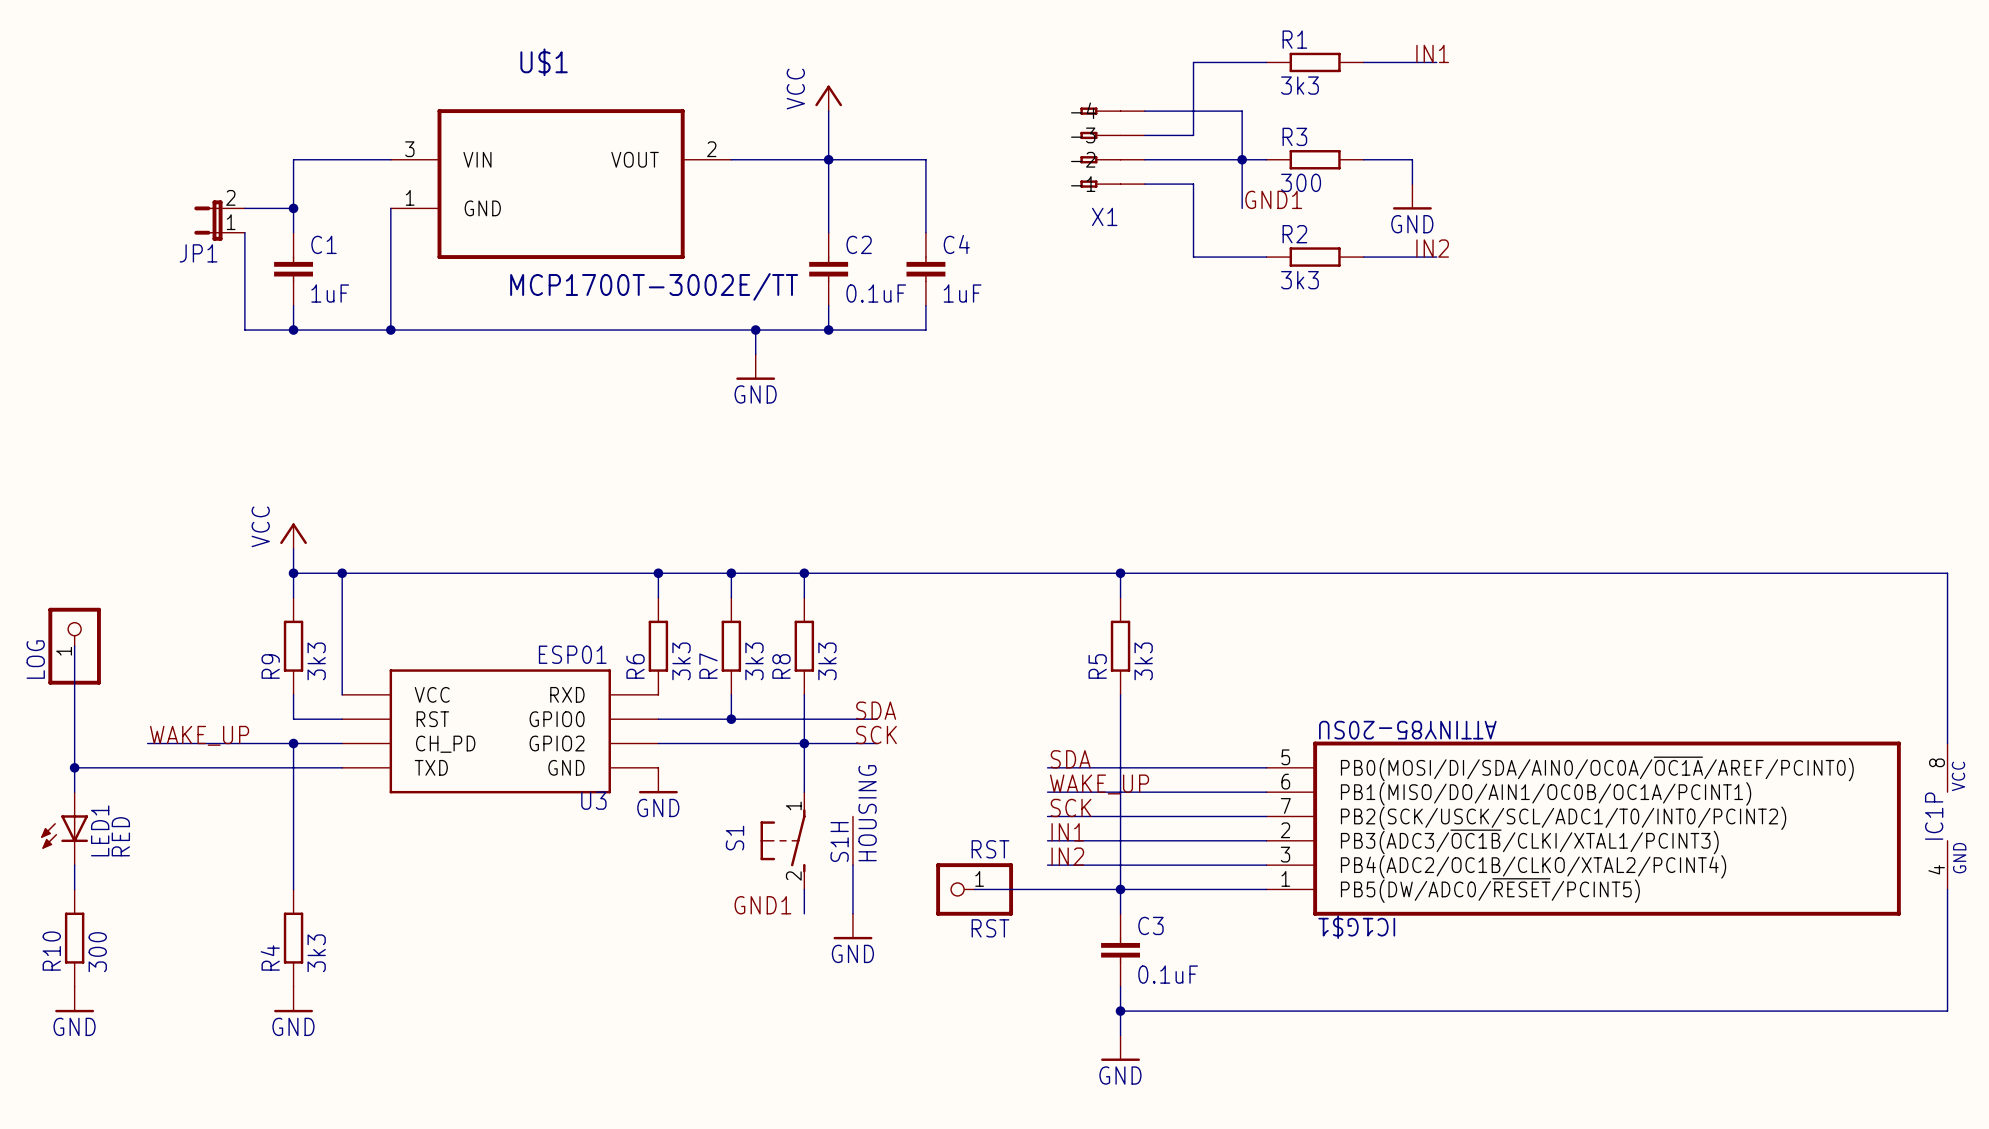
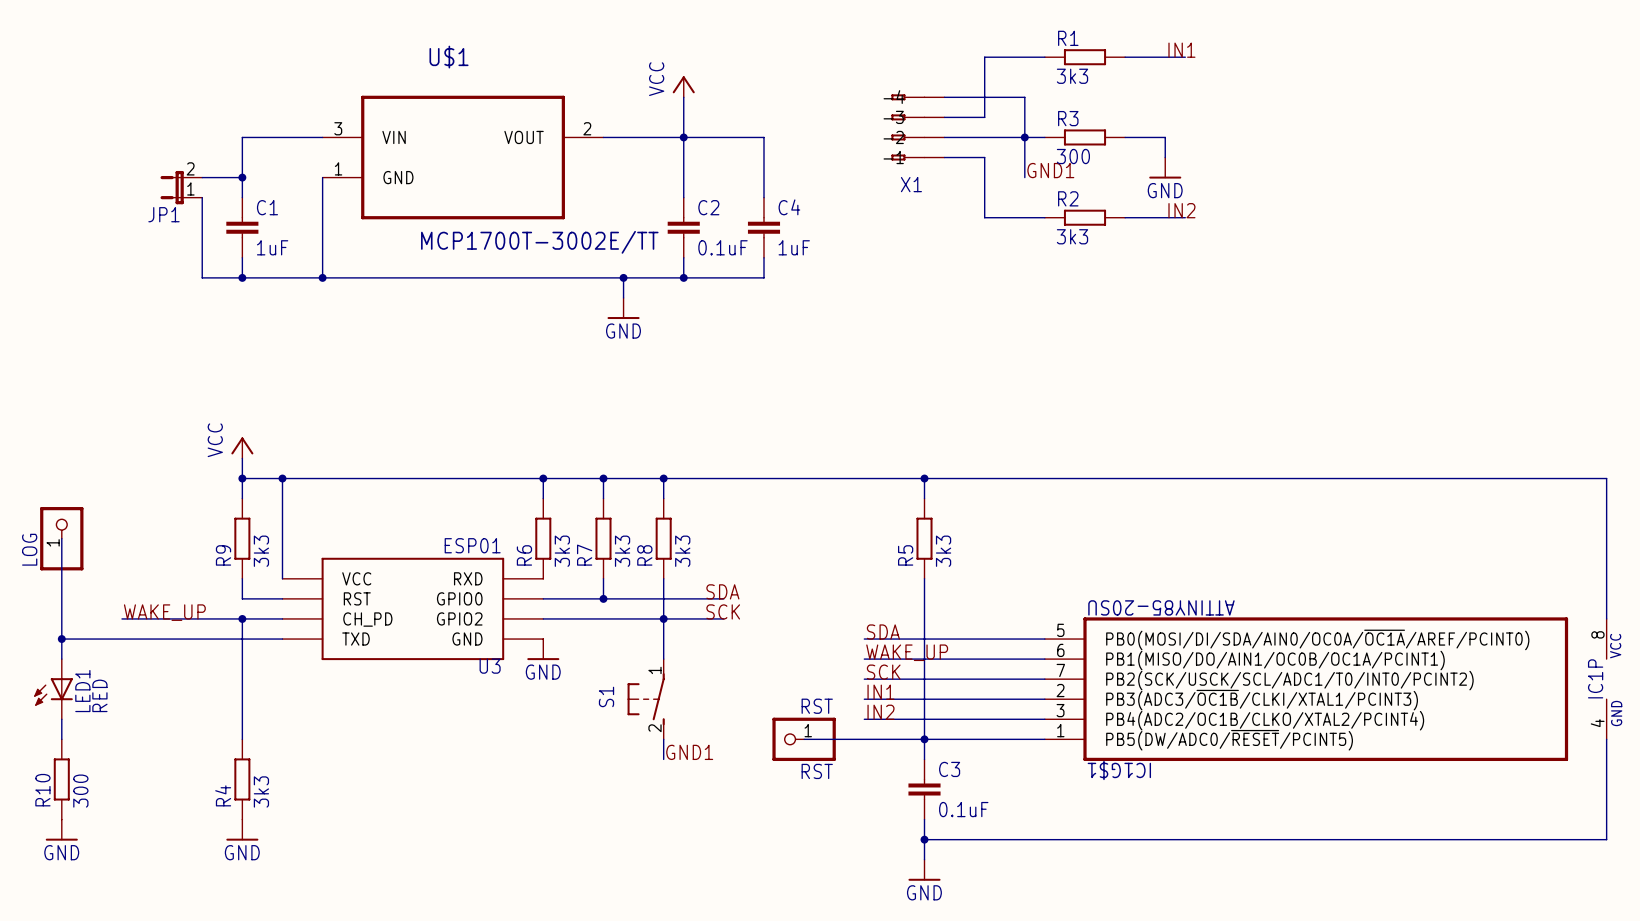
S1H: (852, 840) -> none
wire: (852, 865) (852, 913) -> none
label position: GND1 (762, 905) -> GND1 (689, 752)
power symbol: GND (852, 926) -> none

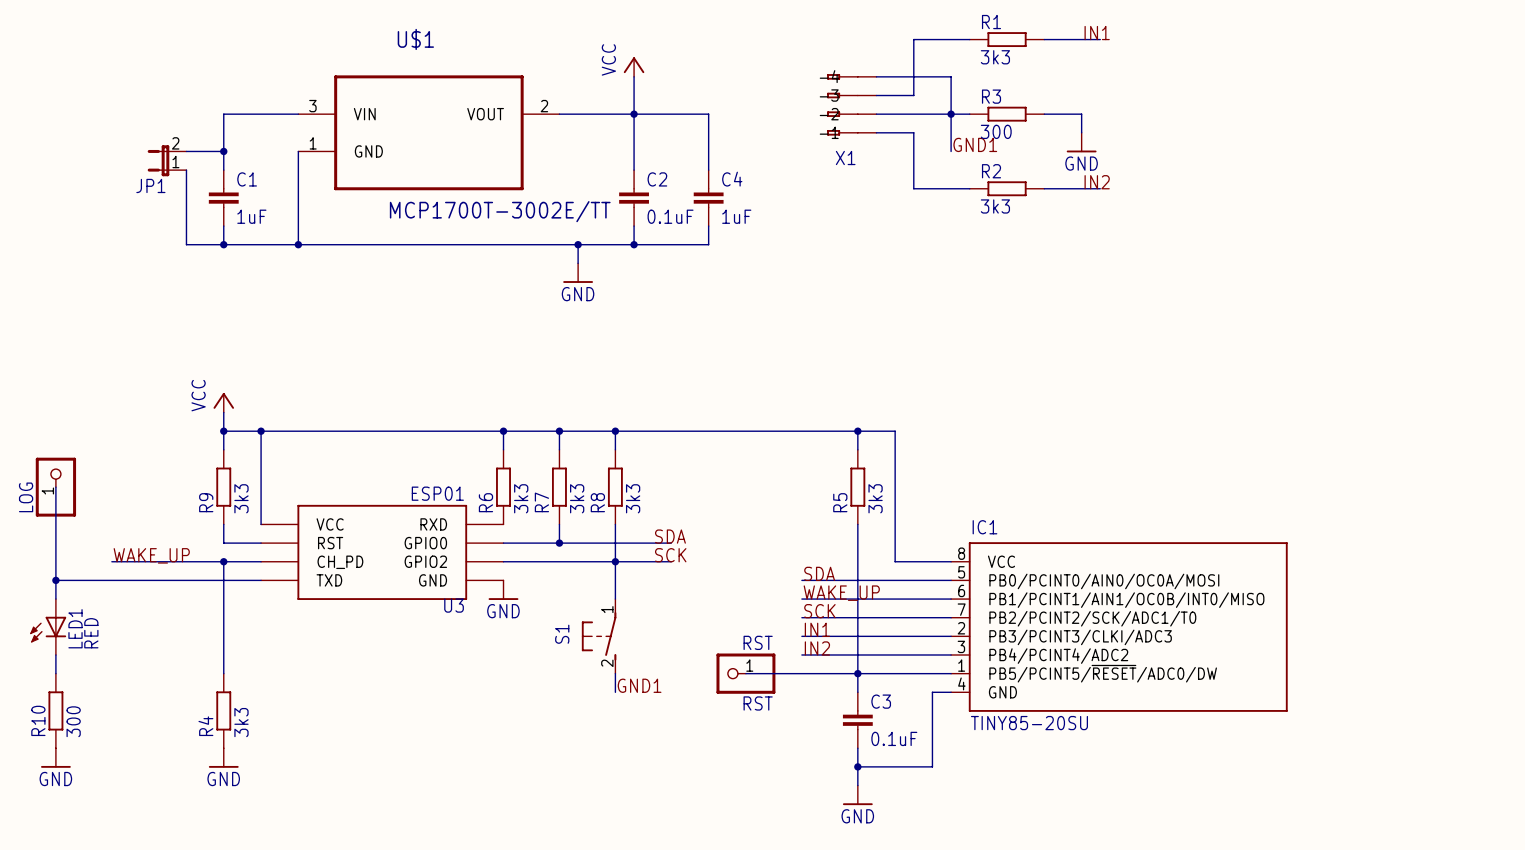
wire: (964, 478) (1606, 478) (1606, 618) -> (895, 431) (895, 561) (951, 561)
IC1P: (1606, 679) -> none
IC1: none -> TINY85-20SU (1119, 627)
IC1G$1: ATTINY85-20SU (1306, 689) -> none
wire: (1606, 739) (1606, 839) (1004, 839) -> (951, 692) (932, 692) (932, 766)

